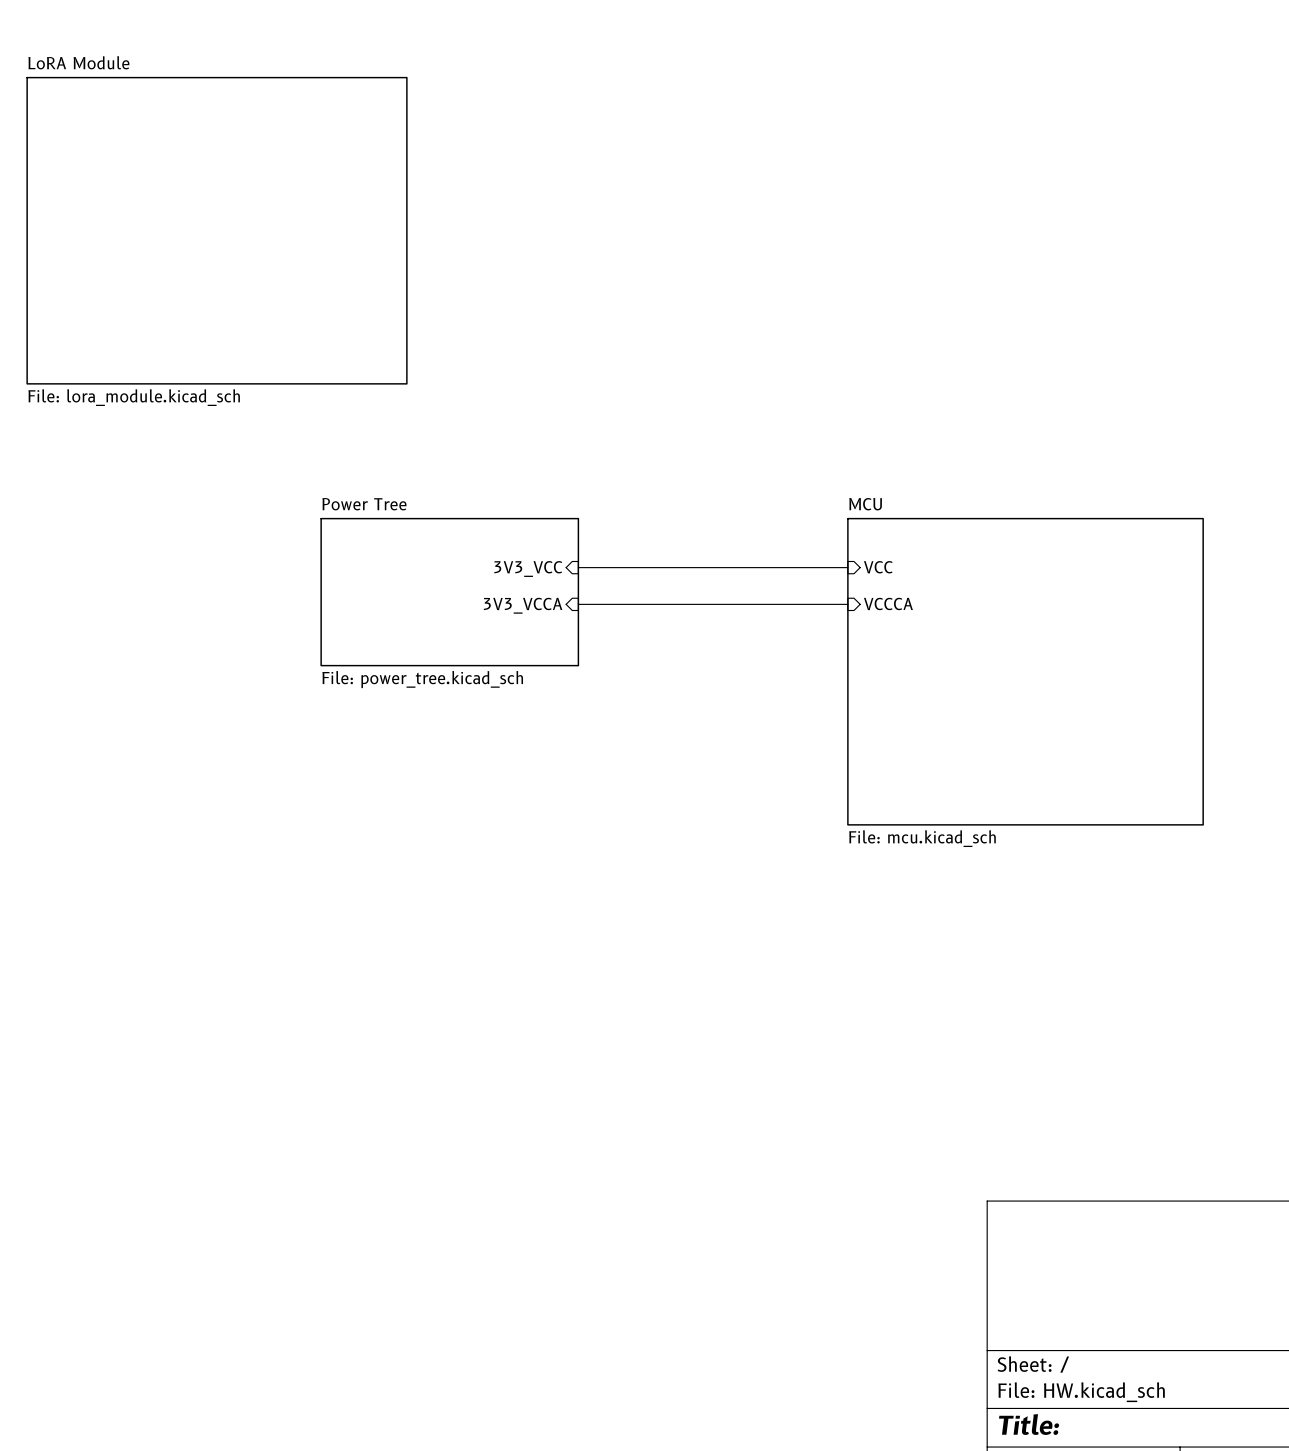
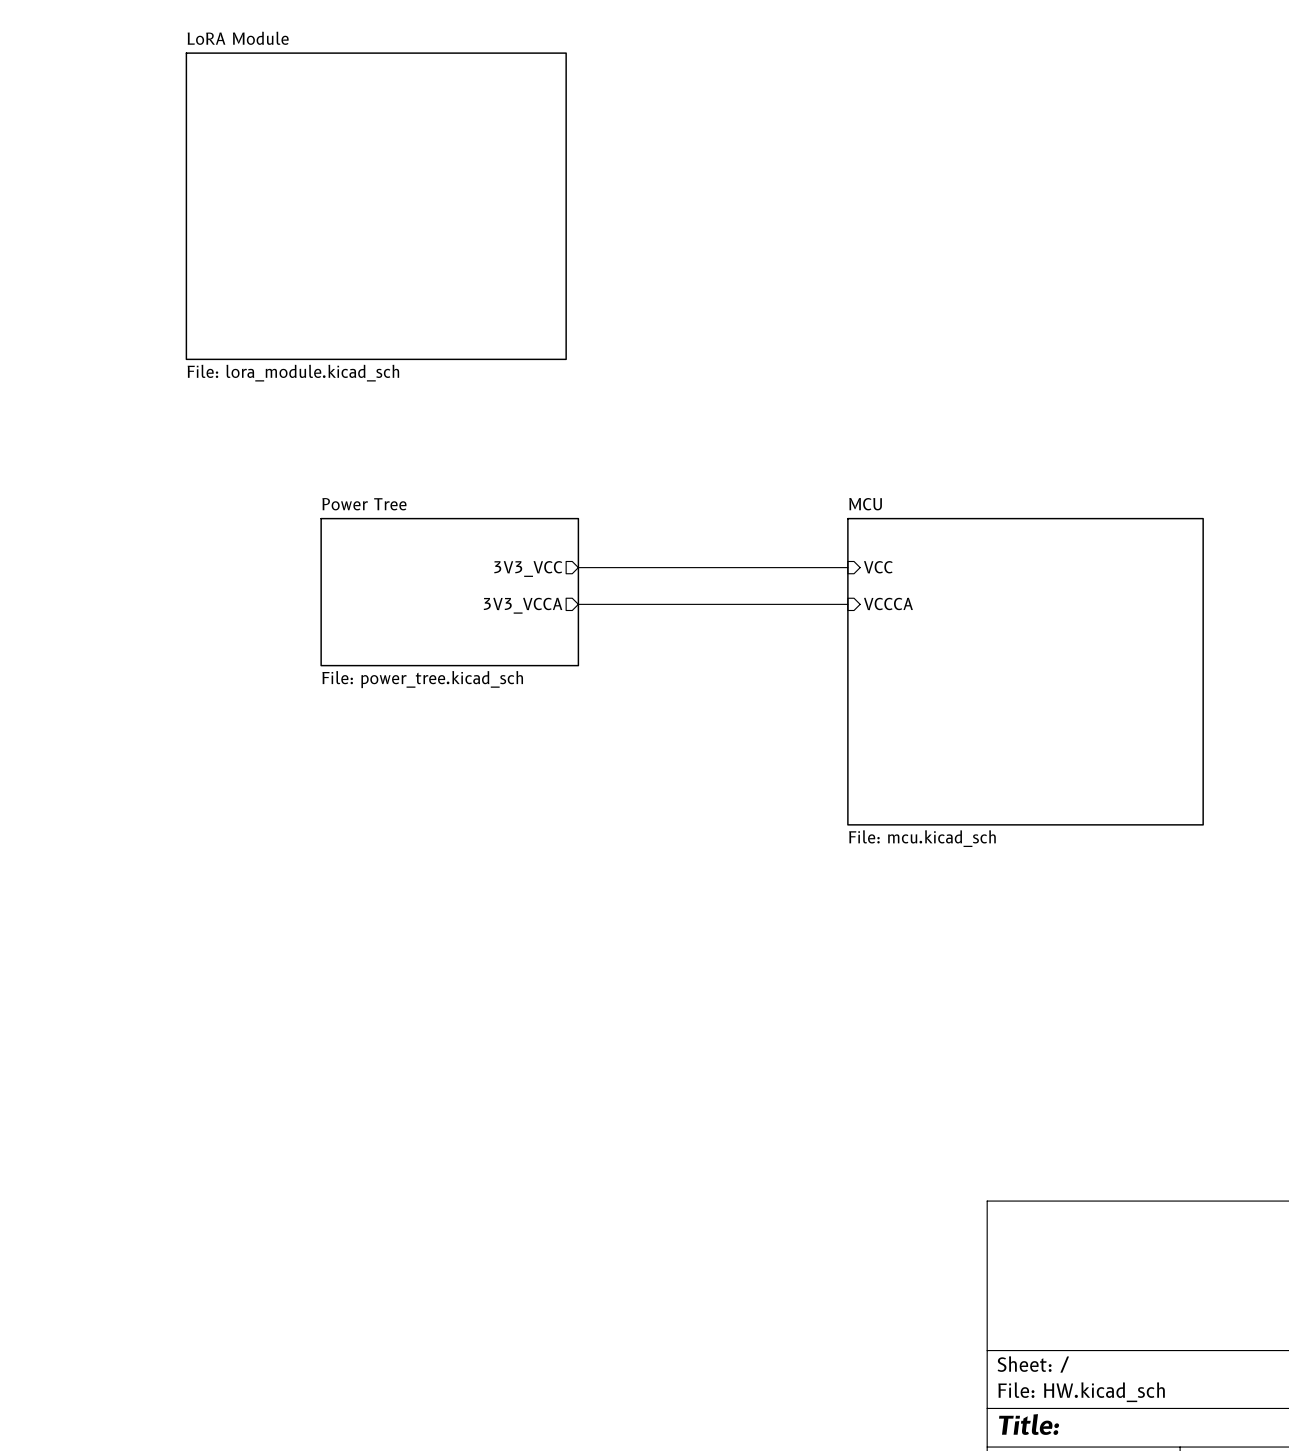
sheet LoRA Module position: (217, 230) -> (376, 206)
sheet pin shape: input (528, 568) -> output (528, 568)
sheet pin shape: input (523, 605) -> output (523, 605)

